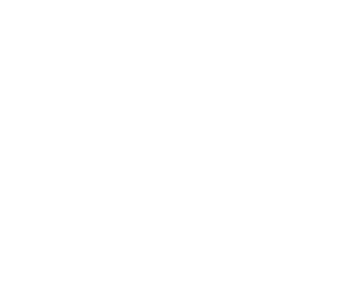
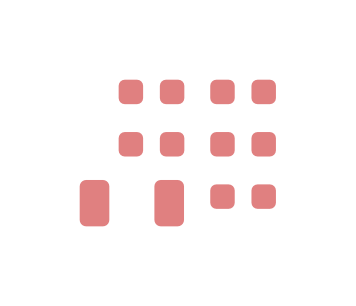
part: none -> (151, 91)
part: none -> (243, 91)
part: none -> (151, 144)
part: none -> (243, 144)
part: none -> (243, 196)
part: none -> (131, 203)

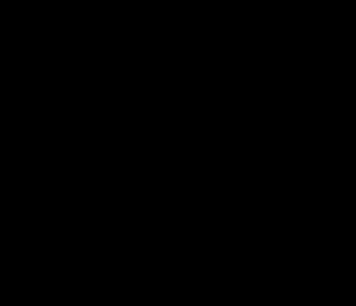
part: (151, 91) -> none
part: (243, 91) -> none
part: (151, 144) -> none
part: (243, 144) -> none
part: (243, 196) -> none
part: (131, 203) -> none

